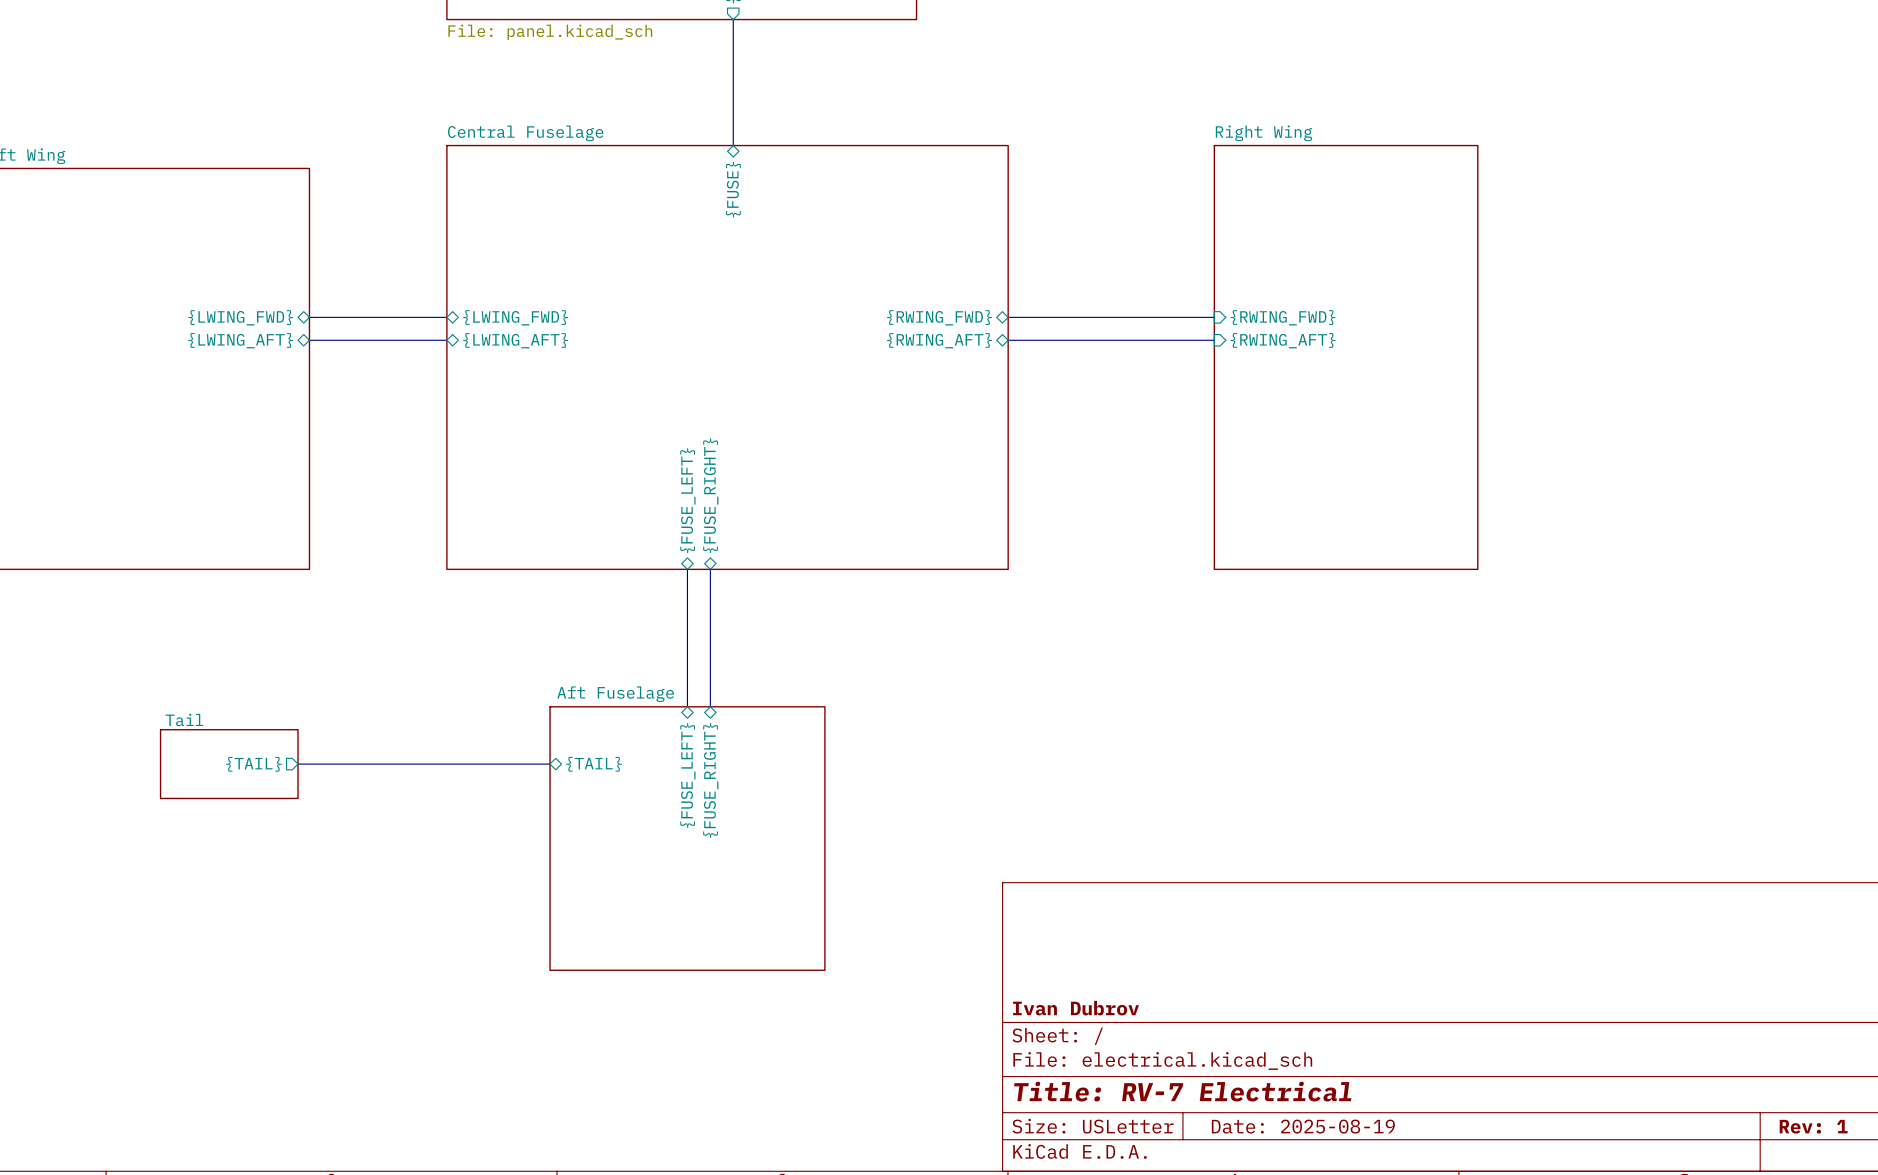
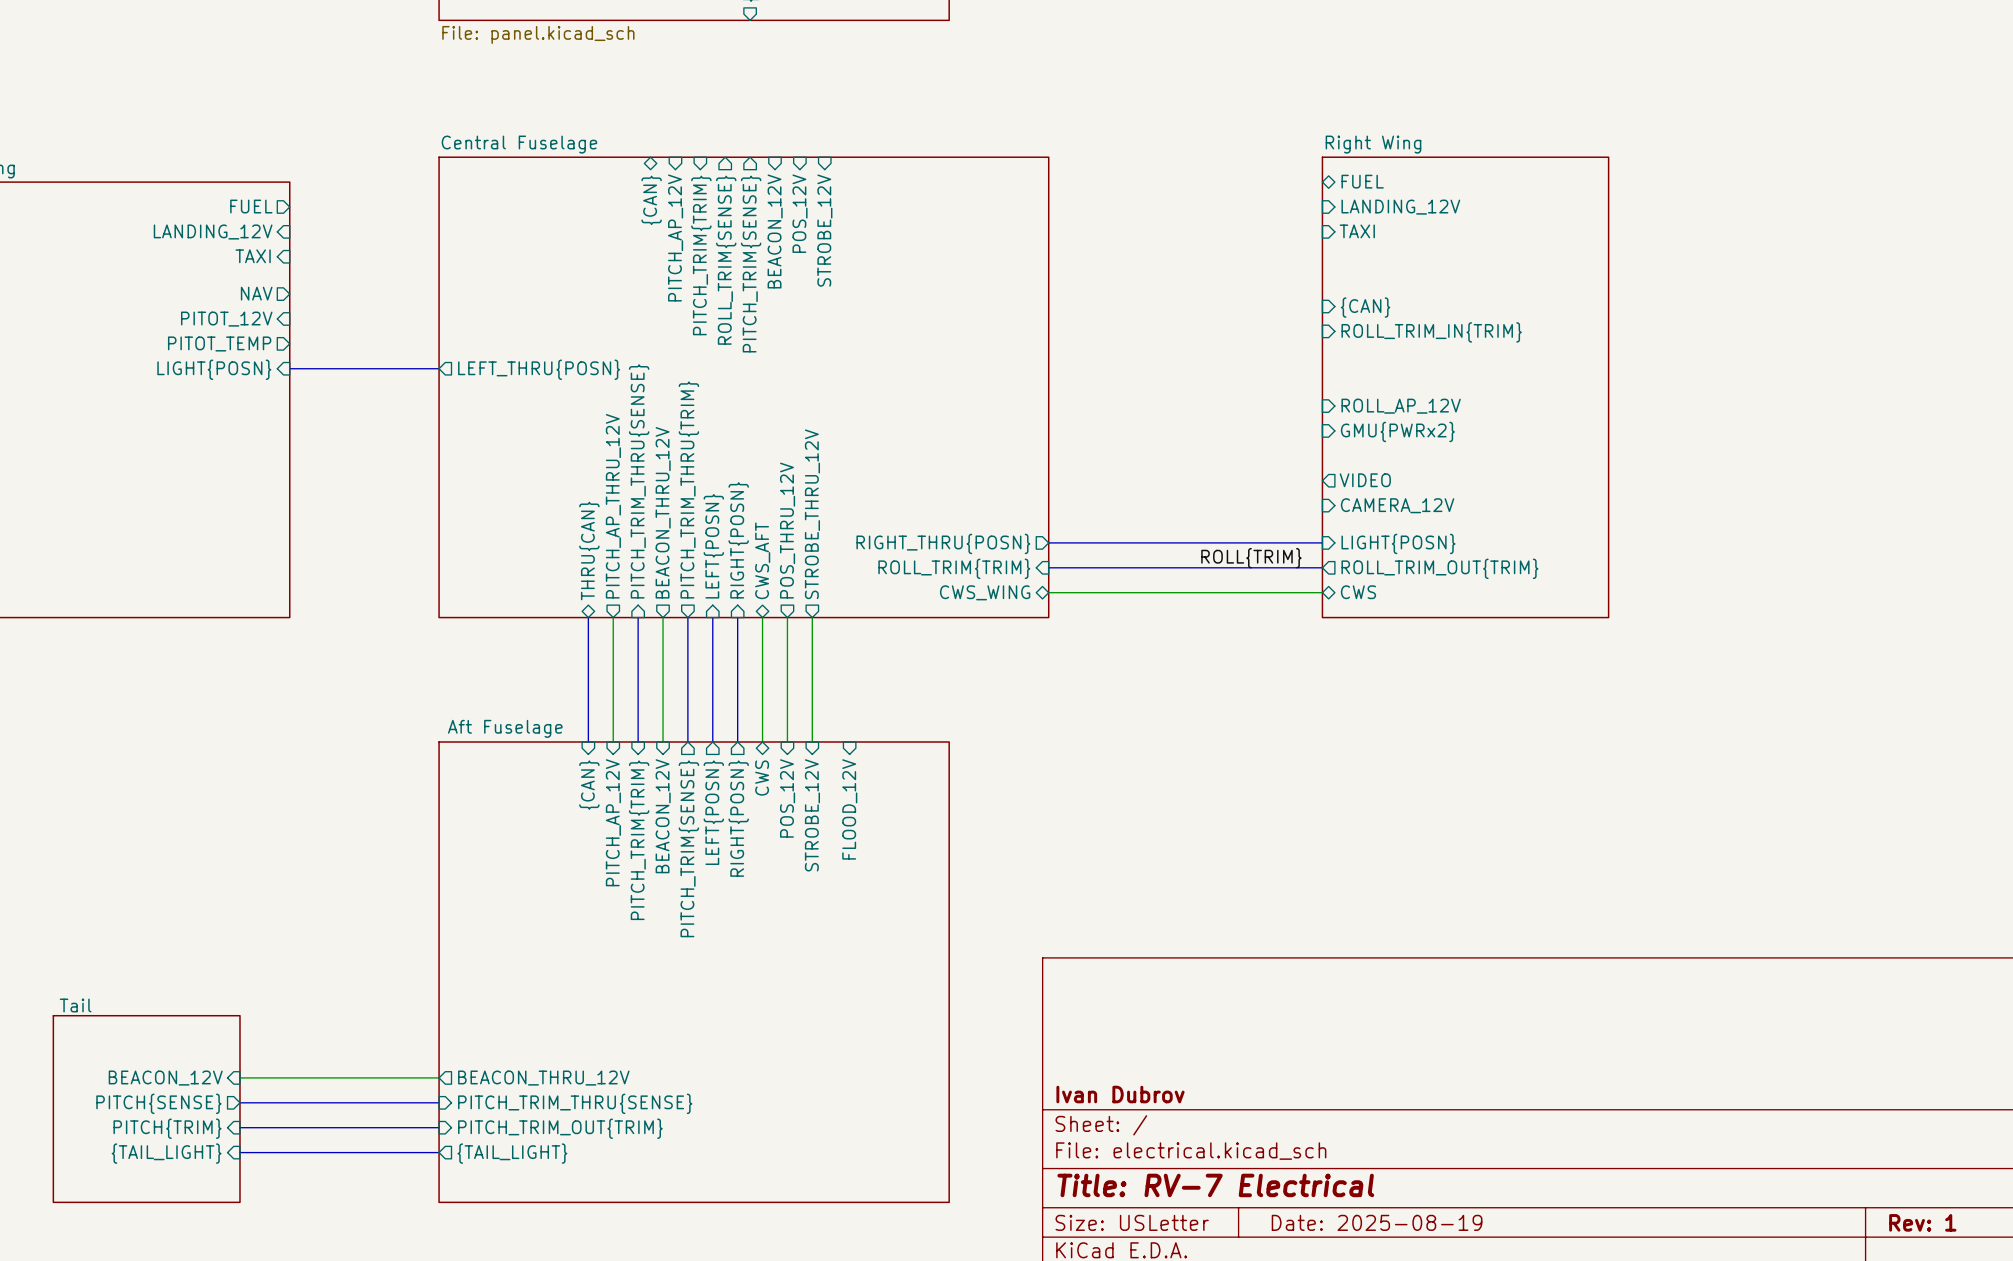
bus: (733, 19) (733, 145) -> none
sheet pin: none -> FUEL (1362, 181)
sheet pin: none -> {CAN} (651, 200)
sheet pin shape: bidirectional (733, 189) -> output (751, 264)
sheet pin: {FUSE} (733, 189) -> PITCH_TRIM{SENSE} (751, 264)
sheet pin: none -> FUEL (251, 206)
sheet pin: none -> LANDING_12V (1400, 207)
sheet pin: none -> POS_12V (800, 213)
sheet pin: none -> BEACON_12V (775, 231)
sheet pin: none -> STROBE_12V (824, 230)
sheet pin: none -> TAXI (1357, 231)
sheet pin: none -> LANDING_12V (213, 232)
sheet pin: none -> PITCH_AP_12V (675, 237)
sheet pin: none -> TAXI (253, 256)
sheet pin: none -> PITCH_TRIM{TRIM} (701, 255)
sheet pin: none -> ROLL_TRIM{SENSE} (726, 260)
sheet pin: none -> NAV (256, 293)
sheet pin: none -> {CAN} (1365, 307)
sheet pin: none -> PITOT_12V (226, 319)
sheet pin: none -> ROLL_TRIM_IN{TRIM} (1431, 332)
sheet pin shape: bidirectional (240, 317) -> output (219, 343)
sheet pin: {LWING_FWD} (240, 317) -> PITOT_TEMP (219, 343)
bus: (309, 317) (446, 317) -> none
sheet pin: {LWING_FWD} (515, 317) -> none
sheet pin: {RWING_FWD} (939, 317) -> none
bus: (1008, 317) (1214, 317) -> none
sheet pin: {RWING_FWD} (1283, 317) -> none
sheet pin shape: bidirectional (240, 340) -> input (214, 369)
sheet pin: {LWING_AFT} (240, 340) -> LIGHT{POSN} (214, 369)
sheet pin shape: bidirectional (515, 340) -> output (539, 369)
sheet pin: {LWING_AFT} (515, 340) -> LEFT_THRU{POSN} (539, 369)
sheet pin: {RWING_AFT} (939, 340) -> none
bus: (1008, 340) (1214, 340) -> none
sheet pin: {RWING_AFT} (1283, 340) -> none
sheet Right Wing position: (1346, 357) -> (1465, 387)
sheet pin: none -> ROLL_AP_12V (1401, 406)
sheet pin: none -> GMU{PWRx2} (1397, 431)
sheet pin: none -> VIDEO (1365, 480)
sheet pin: none -> PITCH_TRIM_THRU{SENSE} (639, 481)
sheet pin: none -> PITCH_TRIM_THRU{TRIM} (688, 490)
sheet pin: none -> CAMERA_12V (1397, 505)
sheet pin: none -> PITCH_AP_THRU_12V (613, 506)
sheet pin: none -> BEACON_THRU_12V (663, 512)
sheet pin: none -> STROBE_THRU_12V (812, 514)
sheet pin: {FUSE_RIGHT} (710, 495) -> none
sheet pin: none -> POS_THRU_12V (787, 530)
sheet pin: {FUSE_LEFT} (687, 500) -> none
sheet pin: none -> RIGHT{POSN} (738, 540)
bus: none -> (1048, 542) (1322, 542)
sheet pin: none -> LIGHT{POSN} (1398, 543)
sheet pin: none -> RIGHT_THRU{POSN} (943, 543)
sheet pin: none -> LEFT{POSN} (713, 546)
sheet pin: none -> THRU{CAN} (589, 551)
label: none -> ROLL{TRIM} (1251, 558)
sheet pin: none -> CWS_AFT (762, 560)
sheet pin: none -> ROLL_TRIM{TRIM} (954, 568)
bus: none -> (1048, 567) (1322, 567)
sheet pin: none -> ROLL_TRIM_OUT{TRIM} (1439, 568)
wire: none -> (1048, 592) (1322, 592)
sheet pin: none -> CWS (1358, 592)
sheet pin: none -> CWS_WING (985, 592)
bus: none -> (588, 617) (588, 741)
wire: none -> (613, 617) (613, 741)
bus: none -> (638, 617) (638, 741)
wire: none -> (663, 617) (663, 741)
bus: none -> (687, 617) (687, 741)
bus: (687, 569) (687, 706) -> none
bus: none -> (712, 617) (712, 741)
bus: (710, 569) (710, 706) -> none
bus: none -> (737, 617) (737, 741)
wire: none -> (762, 617) (762, 741)
wire: none -> (787, 617) (787, 741)
wire: none -> (812, 617) (812, 741)
sheet pin: none -> CWS (762, 778)
sheet pin: none -> {CAN} (589, 785)
sheet pin: none -> POS_12V (787, 798)
sheet pin: none -> FLOOD_12V (849, 809)
sheet pin: none -> BEACON_12V (663, 816)
sheet pin: none -> LEFT{POSN} (713, 812)
sheet pin: none -> STROBE_12V (812, 815)
sheet pin: none -> RIGHT{POSN} (738, 818)
sheet pin: none -> PITCH_AP_12V (613, 822)
sheet Tail: (229, 764) -> none
sheet pin: {TAIL} (253, 764) -> none
bus: (298, 764) (550, 764) -> none
sheet pin: {TAIL} (594, 764) -> none
sheet pin: {FUSE_LEFT} (687, 775) -> none
sheet pin: none -> PITCH_TRIM{TRIM} (639, 840)
sheet pin: {FUSE_RIGHT} (710, 780) -> none
sheet pin: none -> PITCH_TRIM{SENSE} (688, 848)
sheet Aft Fuselage: (687, 838) -> none
sheet Aft Fuselage: none -> (694, 972)
wire: none -> (239, 1077) (439, 1077)
sheet pin: none -> BEACON_12V (165, 1078)
sheet pin: none -> BEACON_THRU_12V (543, 1078)
sheet pin: none -> PITCH{SENSE} (158, 1103)
bus: none -> (239, 1102) (439, 1102)
sheet pin: none -> PITCH_TRIM_THRU{SENSE} (575, 1103)
sheet Tail: none -> (146, 1109)
bus: none -> (239, 1127) (439, 1127)
sheet pin: none -> PITCH{TRIM} (167, 1128)
sheet pin: none -> PITCH_TRIM_OUT{TRIM} (560, 1128)
bus: none -> (239, 1152) (439, 1152)
sheet pin: none -> {TAIL_LIGHT} (166, 1153)
sheet pin: none -> {TAIL_LIGHT} (512, 1153)

